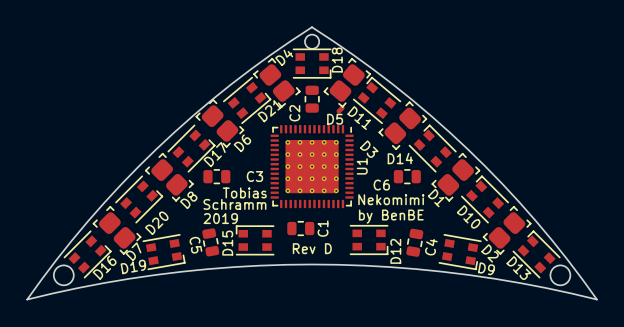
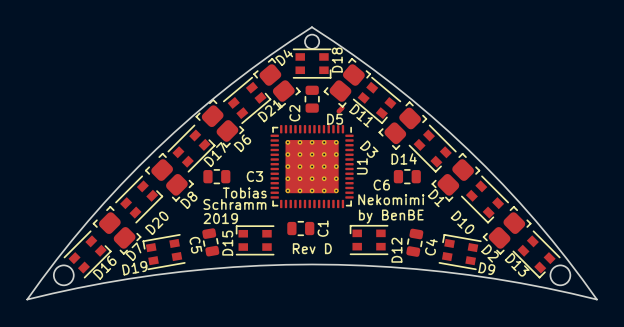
D11 rotation: 0° (377, 100) -> 180° (377, 100)
D14 rotation: 0° (432, 148) -> 180° (432, 148)
D10 rotation: 0° (485, 199) -> 180° (485, 199)
D12 rotation: 0° (369, 240) -> 180° (369, 240)
D19 rotation: 0° (164, 252) -> 180° (164, 252)
D9 rotation: 0° (460, 252) -> 180° (460, 252)
D13 rotation: 0° (536, 254) -> 180° (536, 254)

